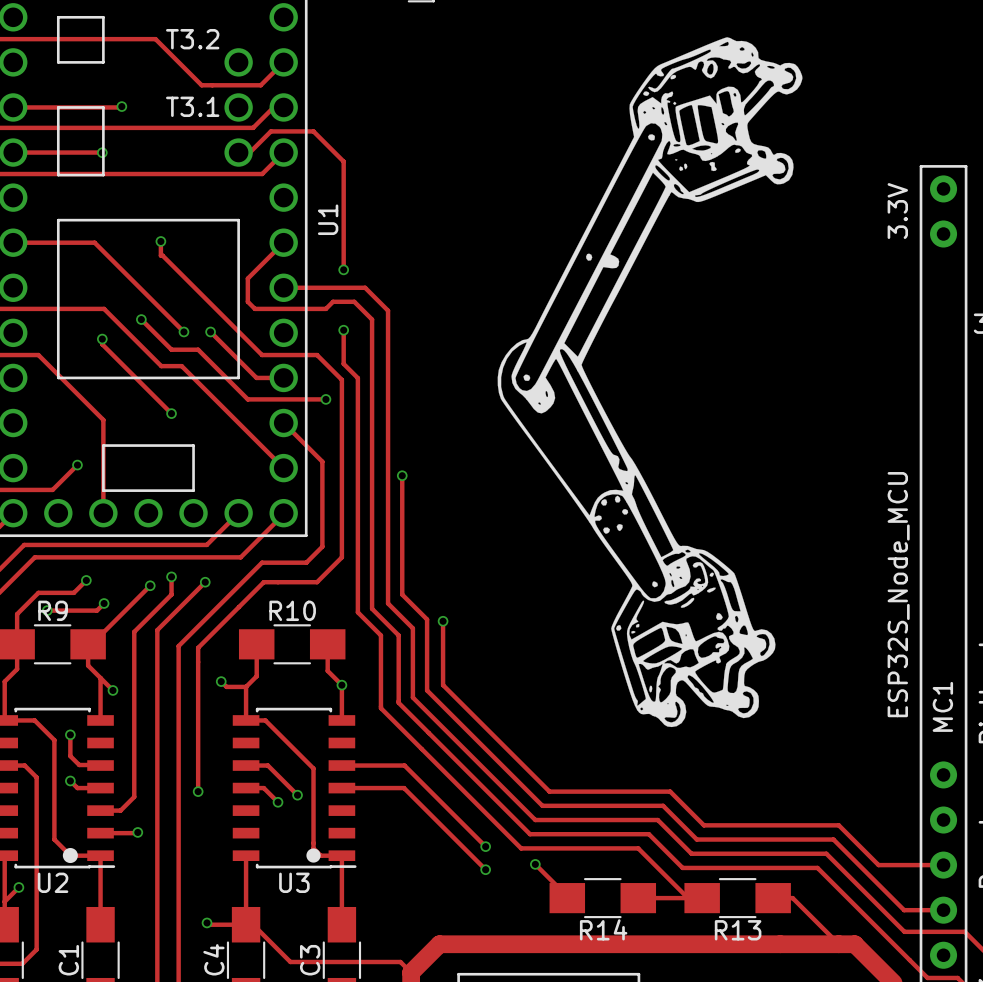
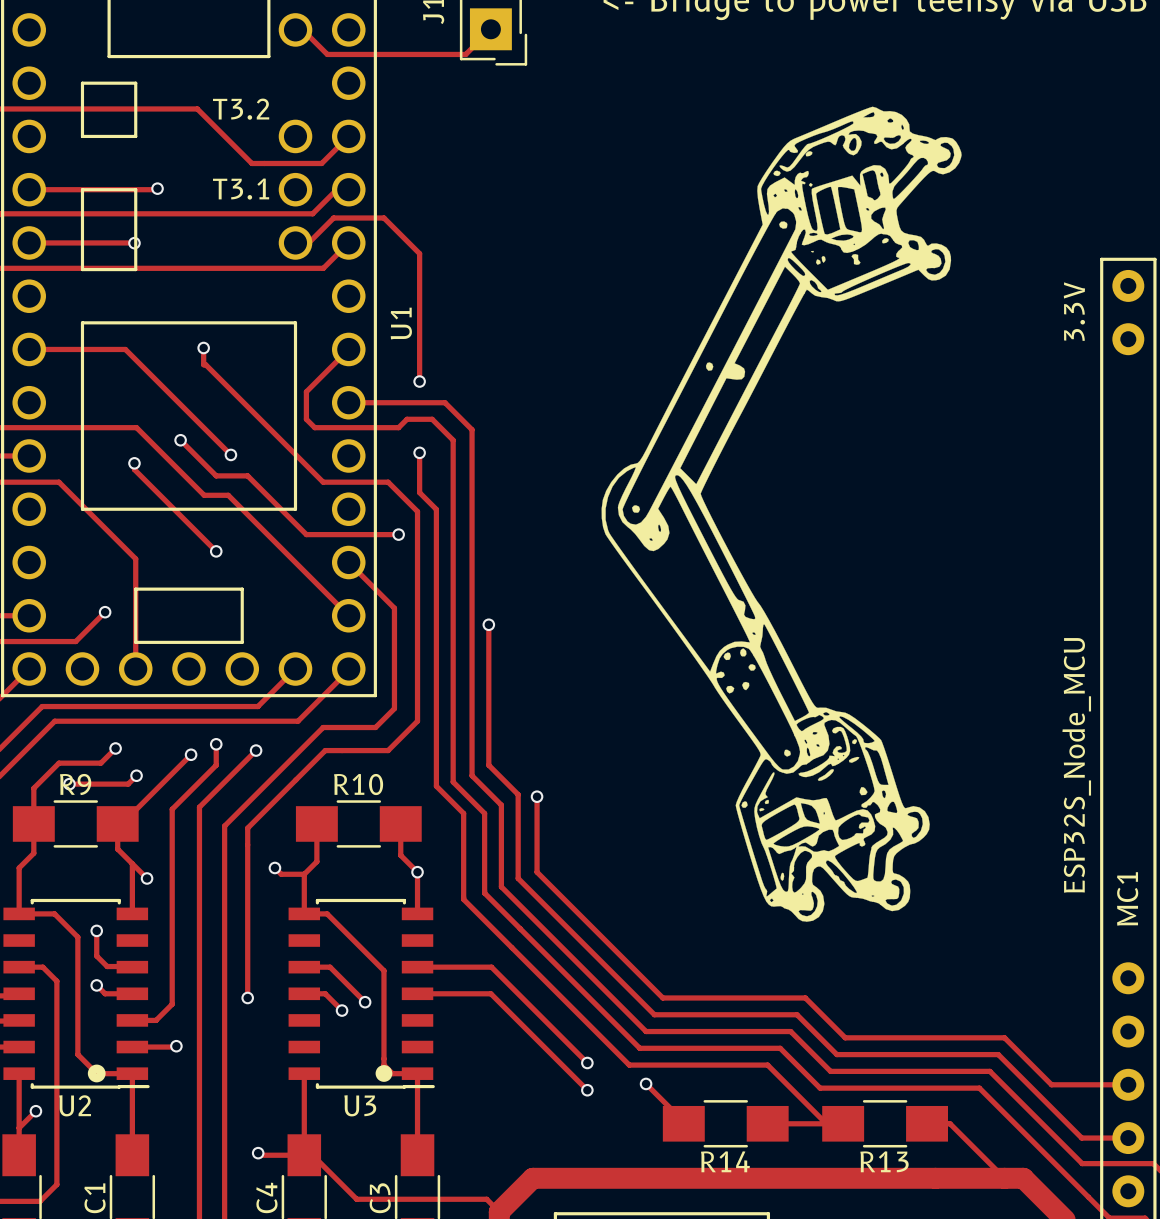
track: (210, 331) (256, 377) (283, 377) -> none
via: (210, 331) -> none

